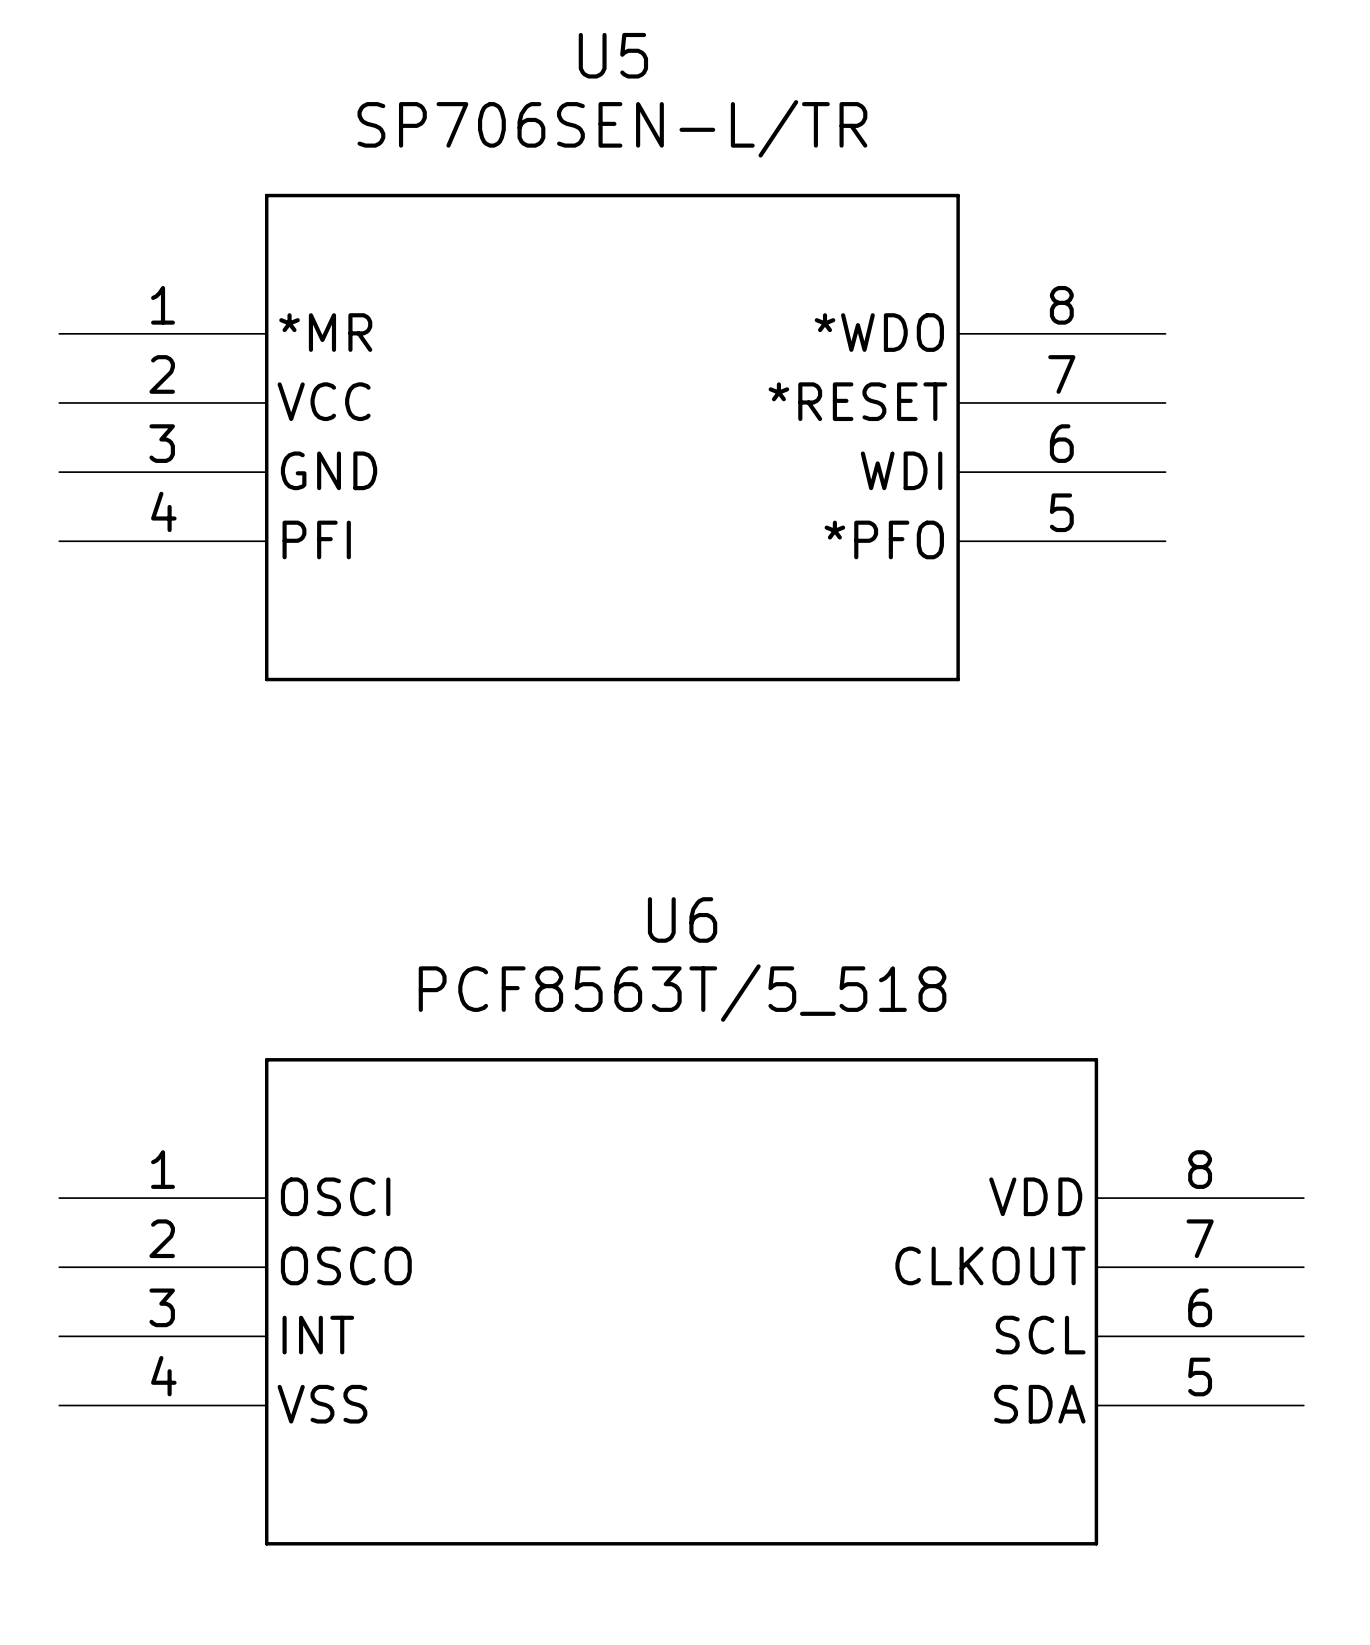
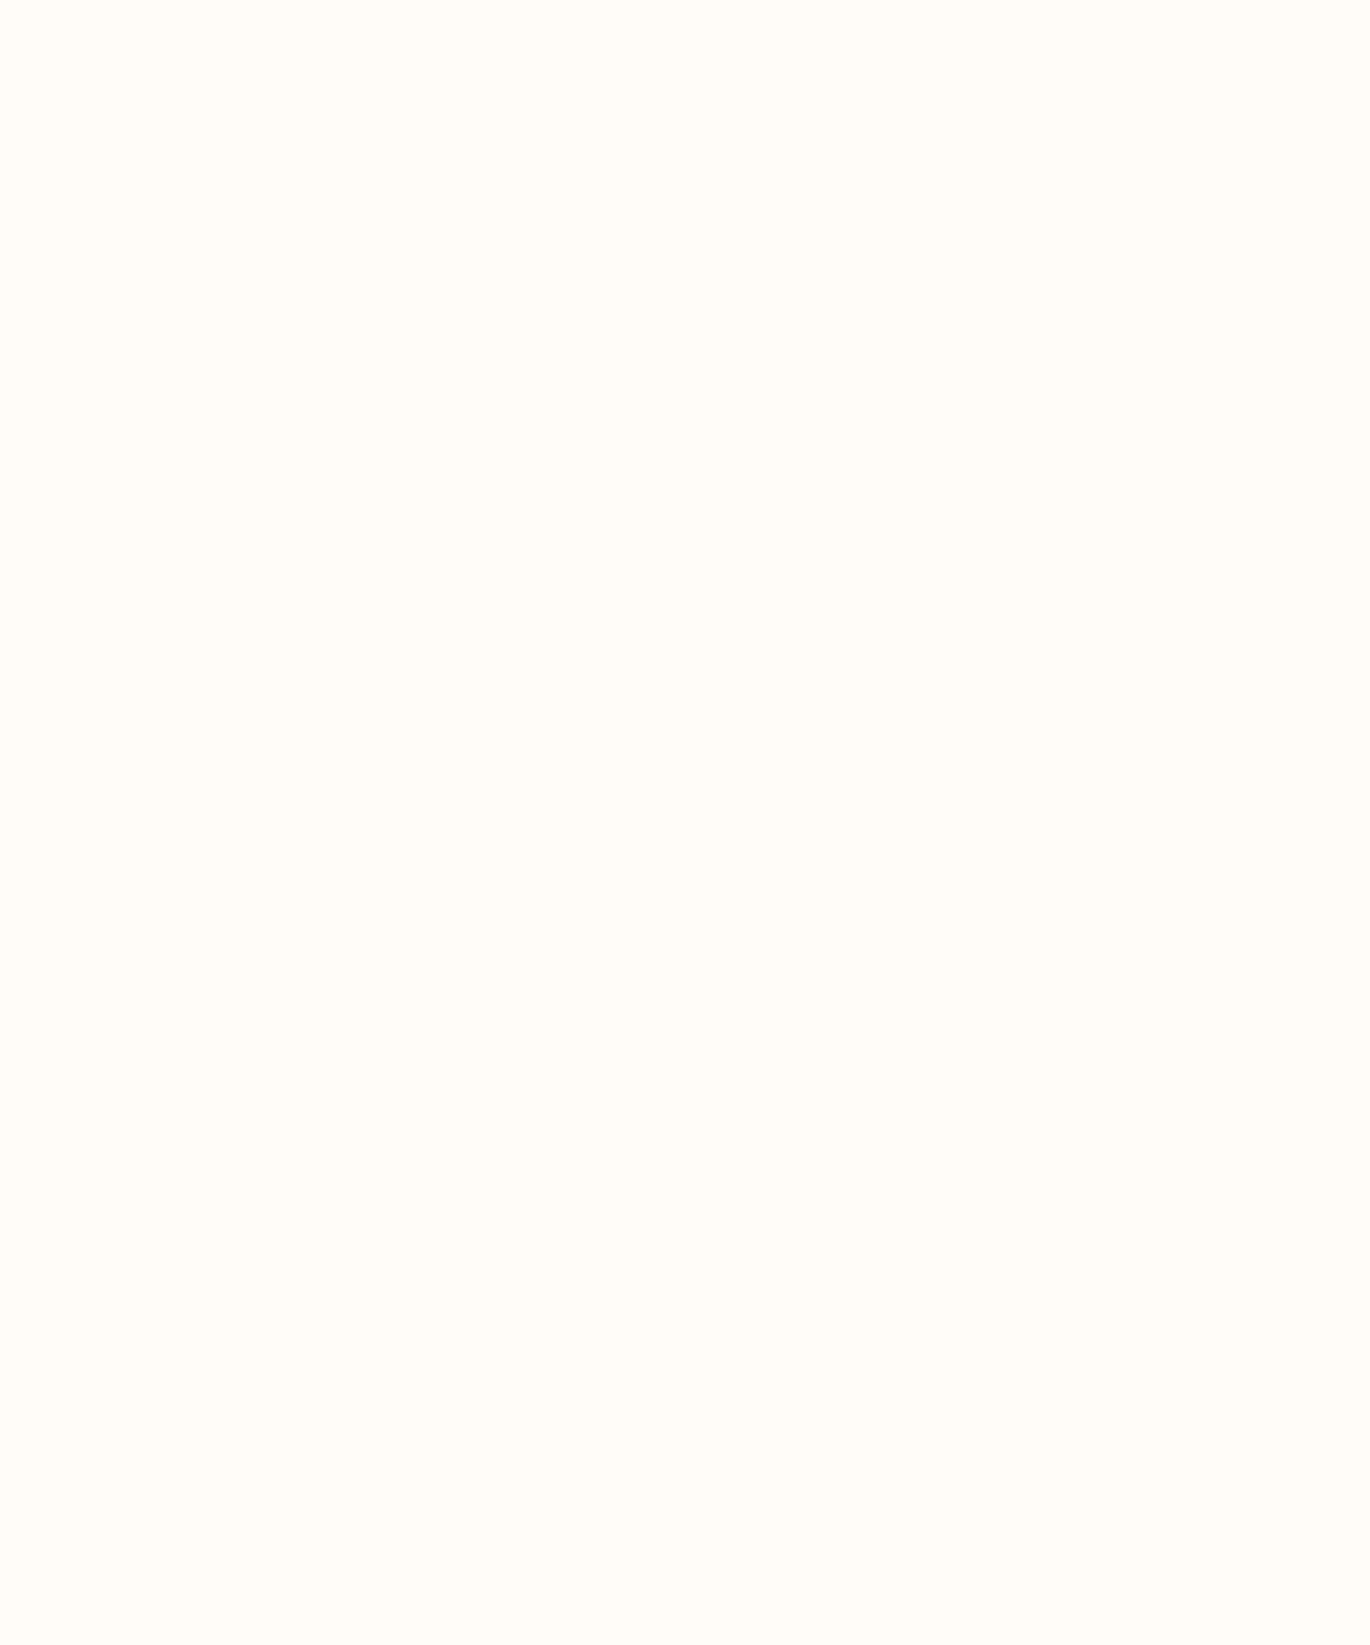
U5: SP706SEN-L/TR (612, 437) -> none
U6: PCF8563T/5_518 (681, 1301) -> none

